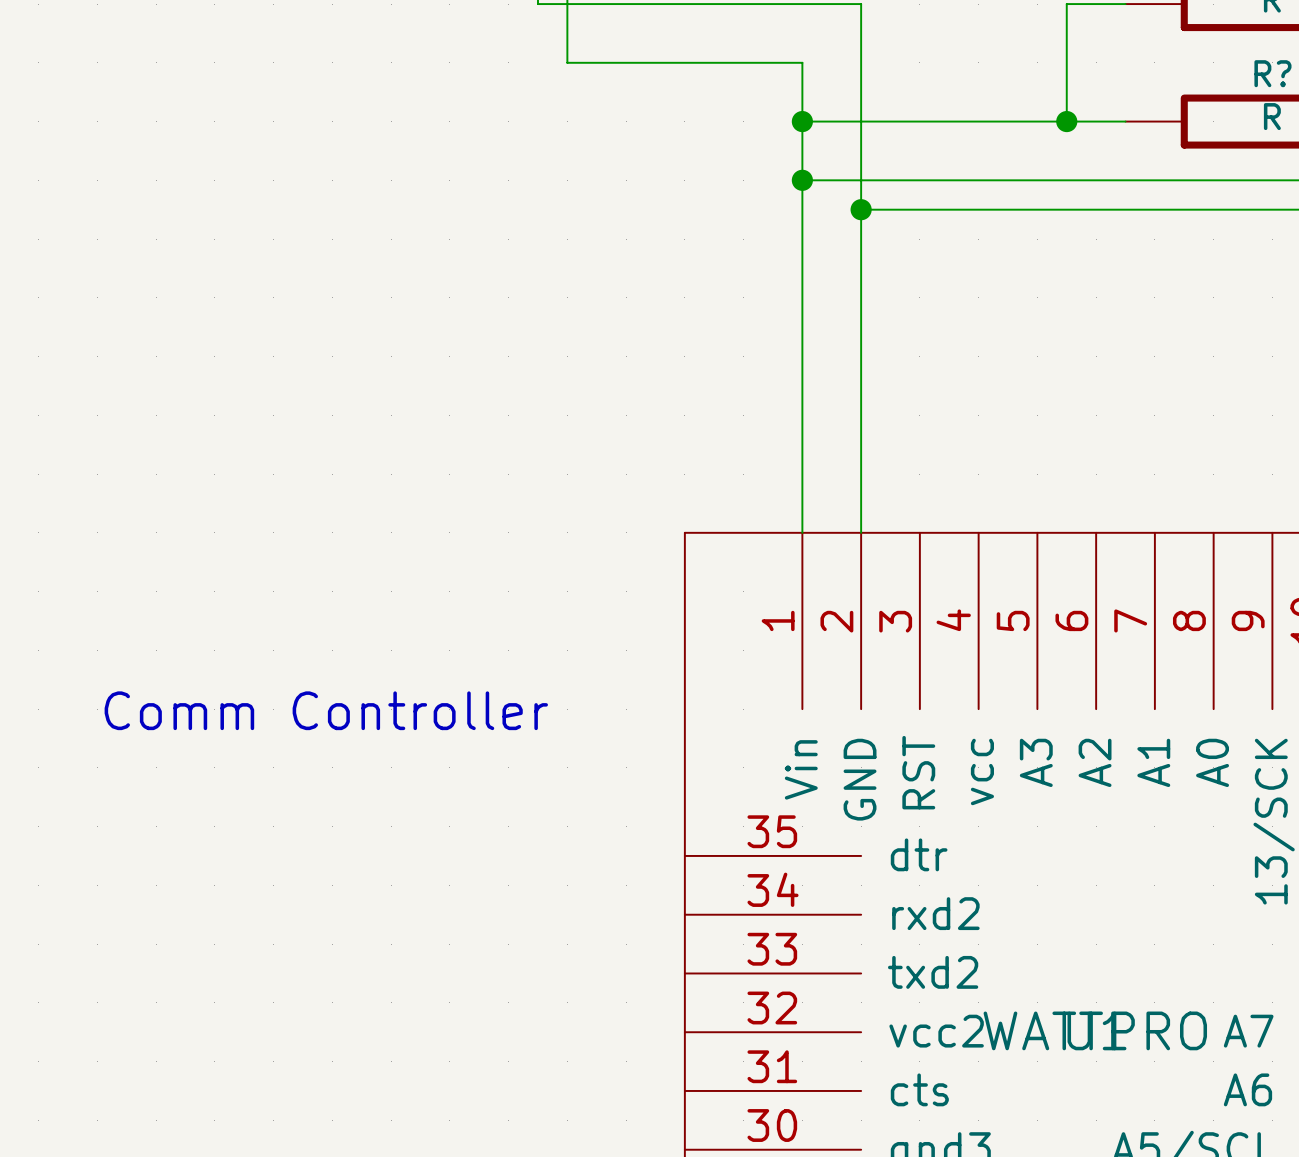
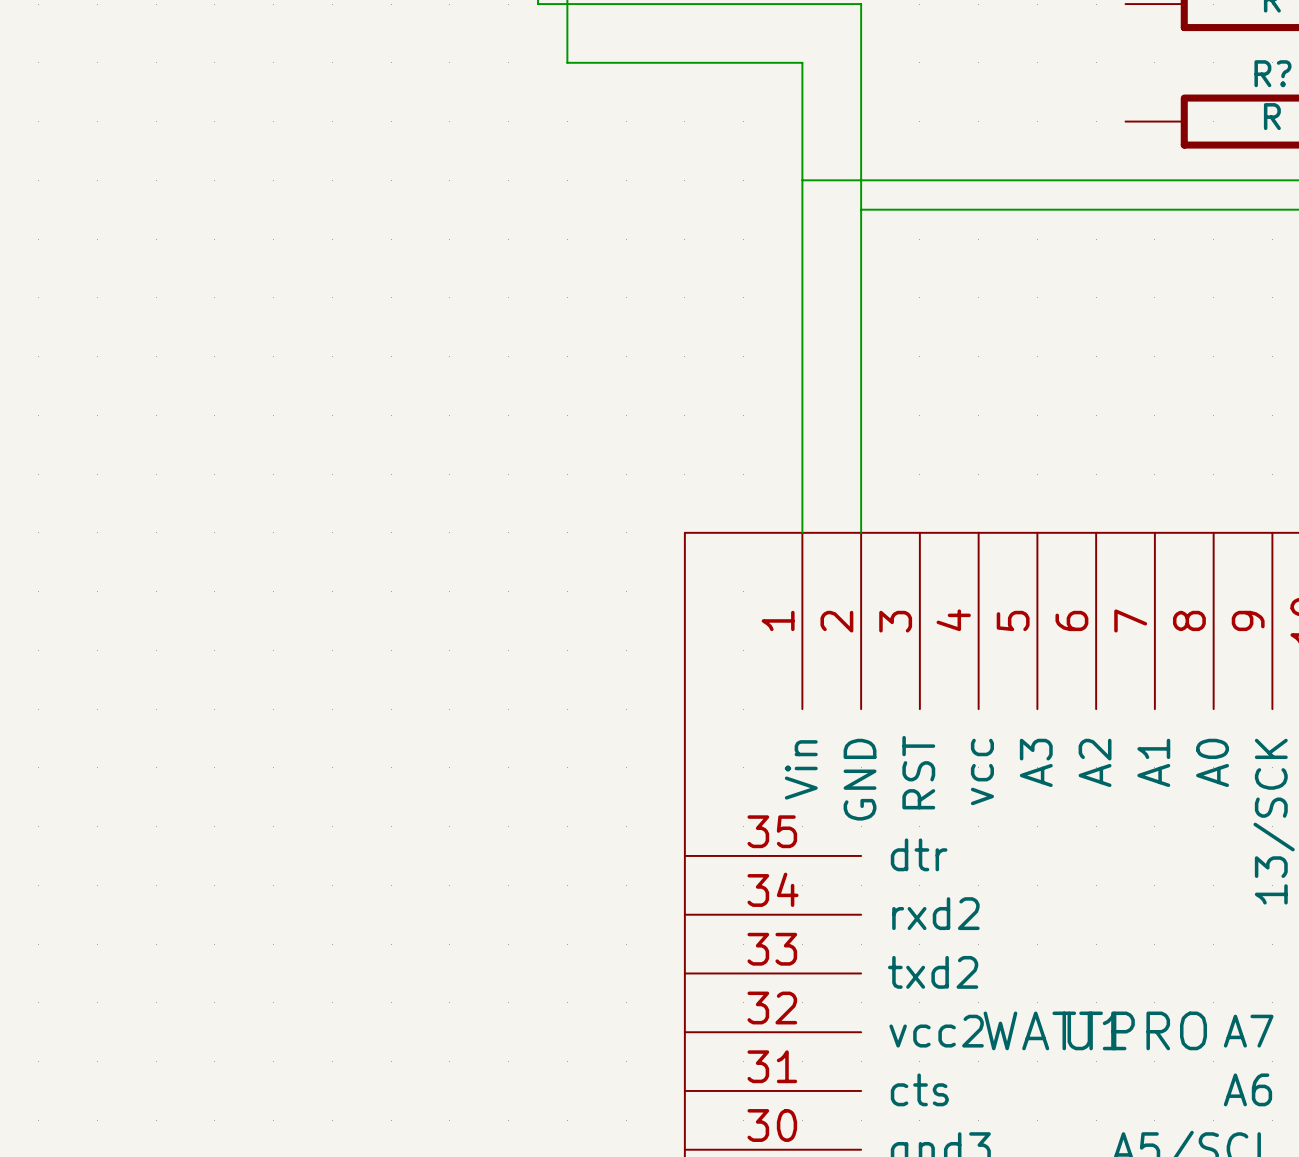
wire: (1125, 4) (1066, 4) (1066, 121) -> none
wire: (802, 121) (1125, 121) -> none
junction: (802, 121) -> none
junction: (1066, 121) -> none
junction: (802, 180) -> none
junction: (861, 209) -> none
text: Comm Controller (326, 710) -> none

